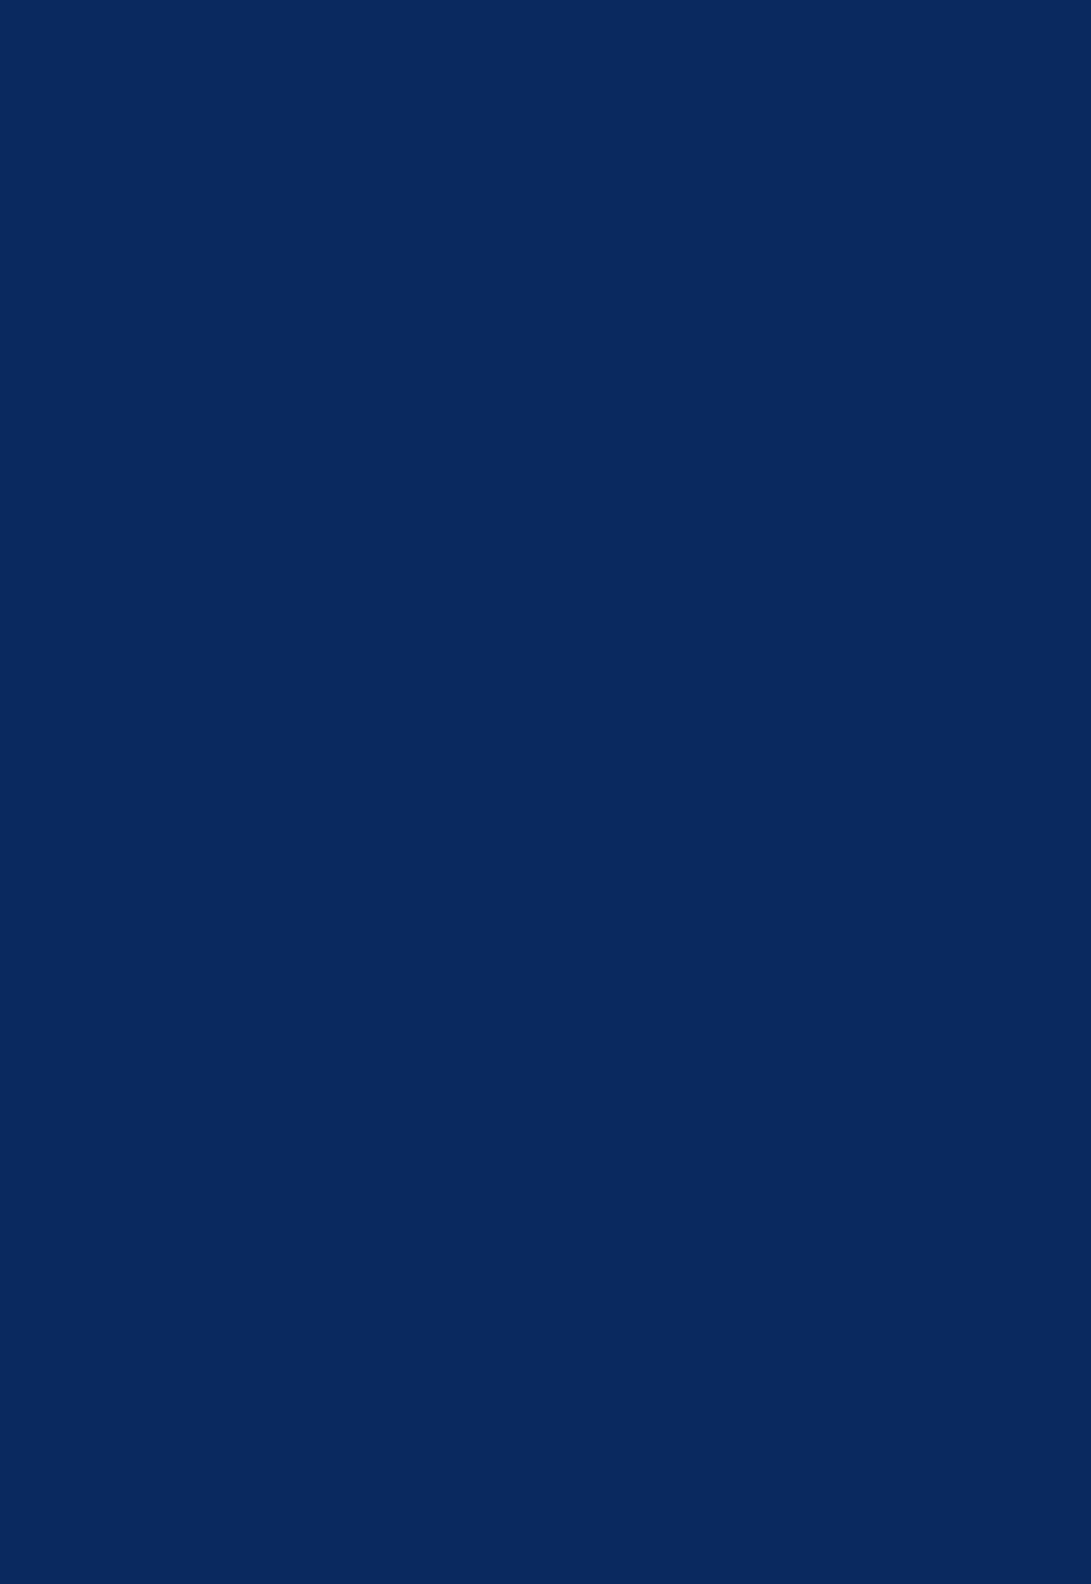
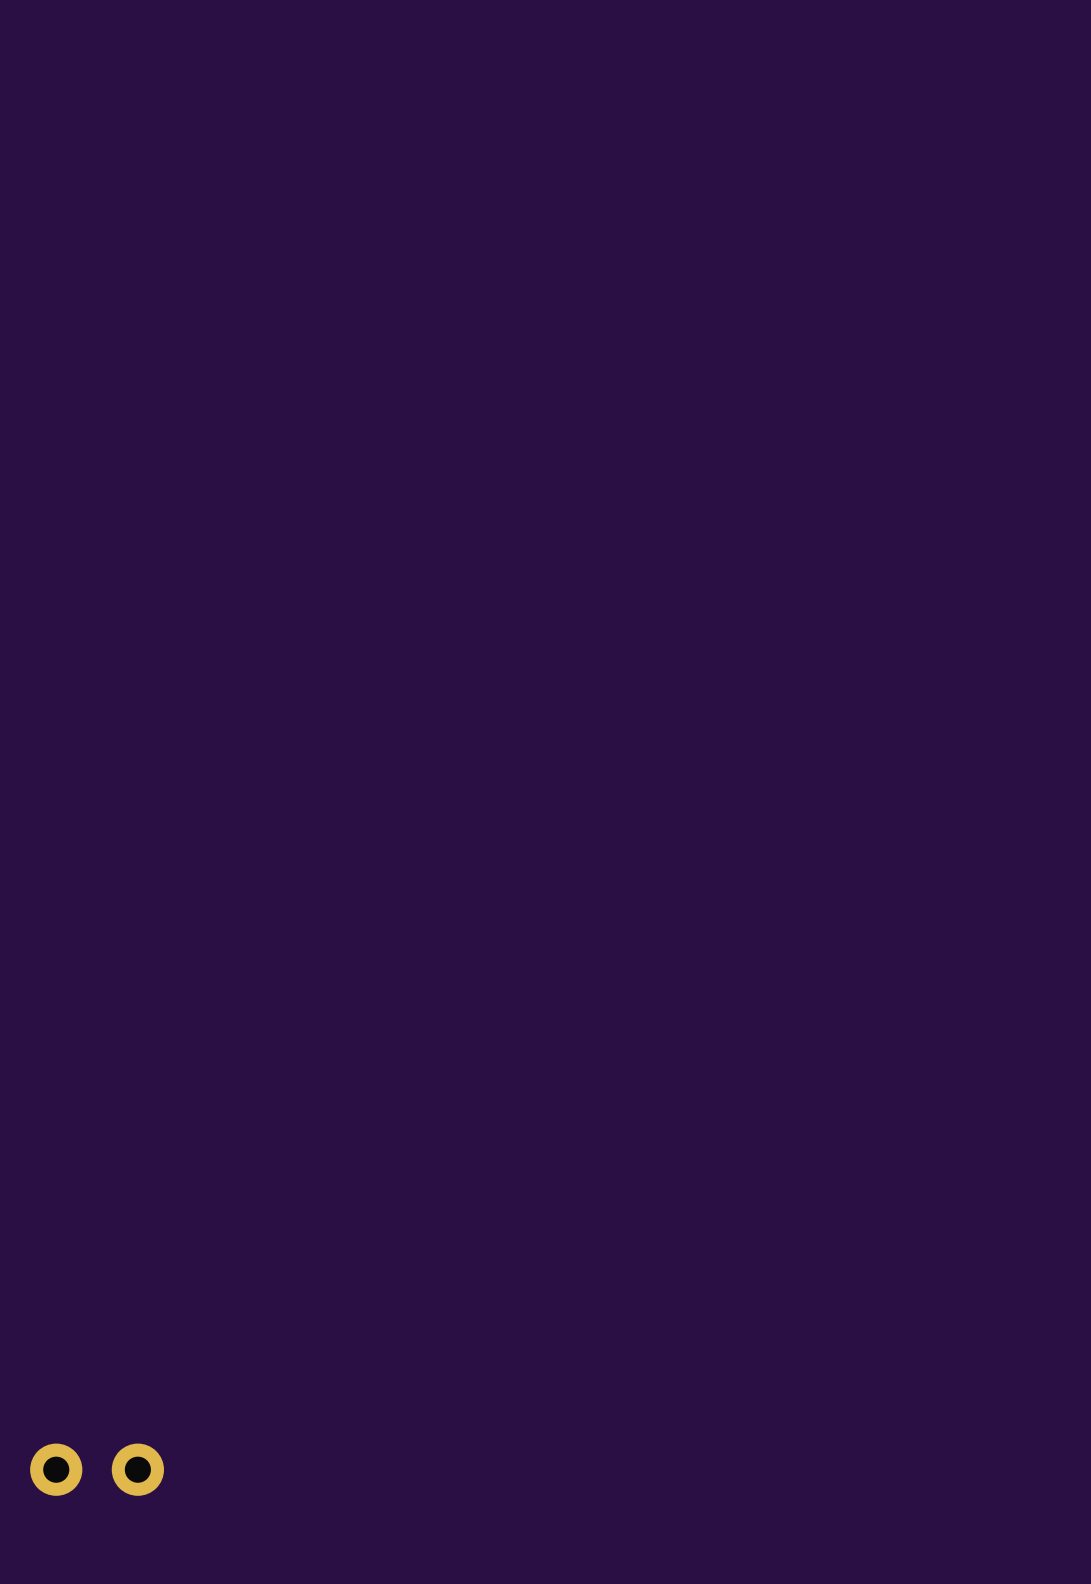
part: none -> (97, 1469)

